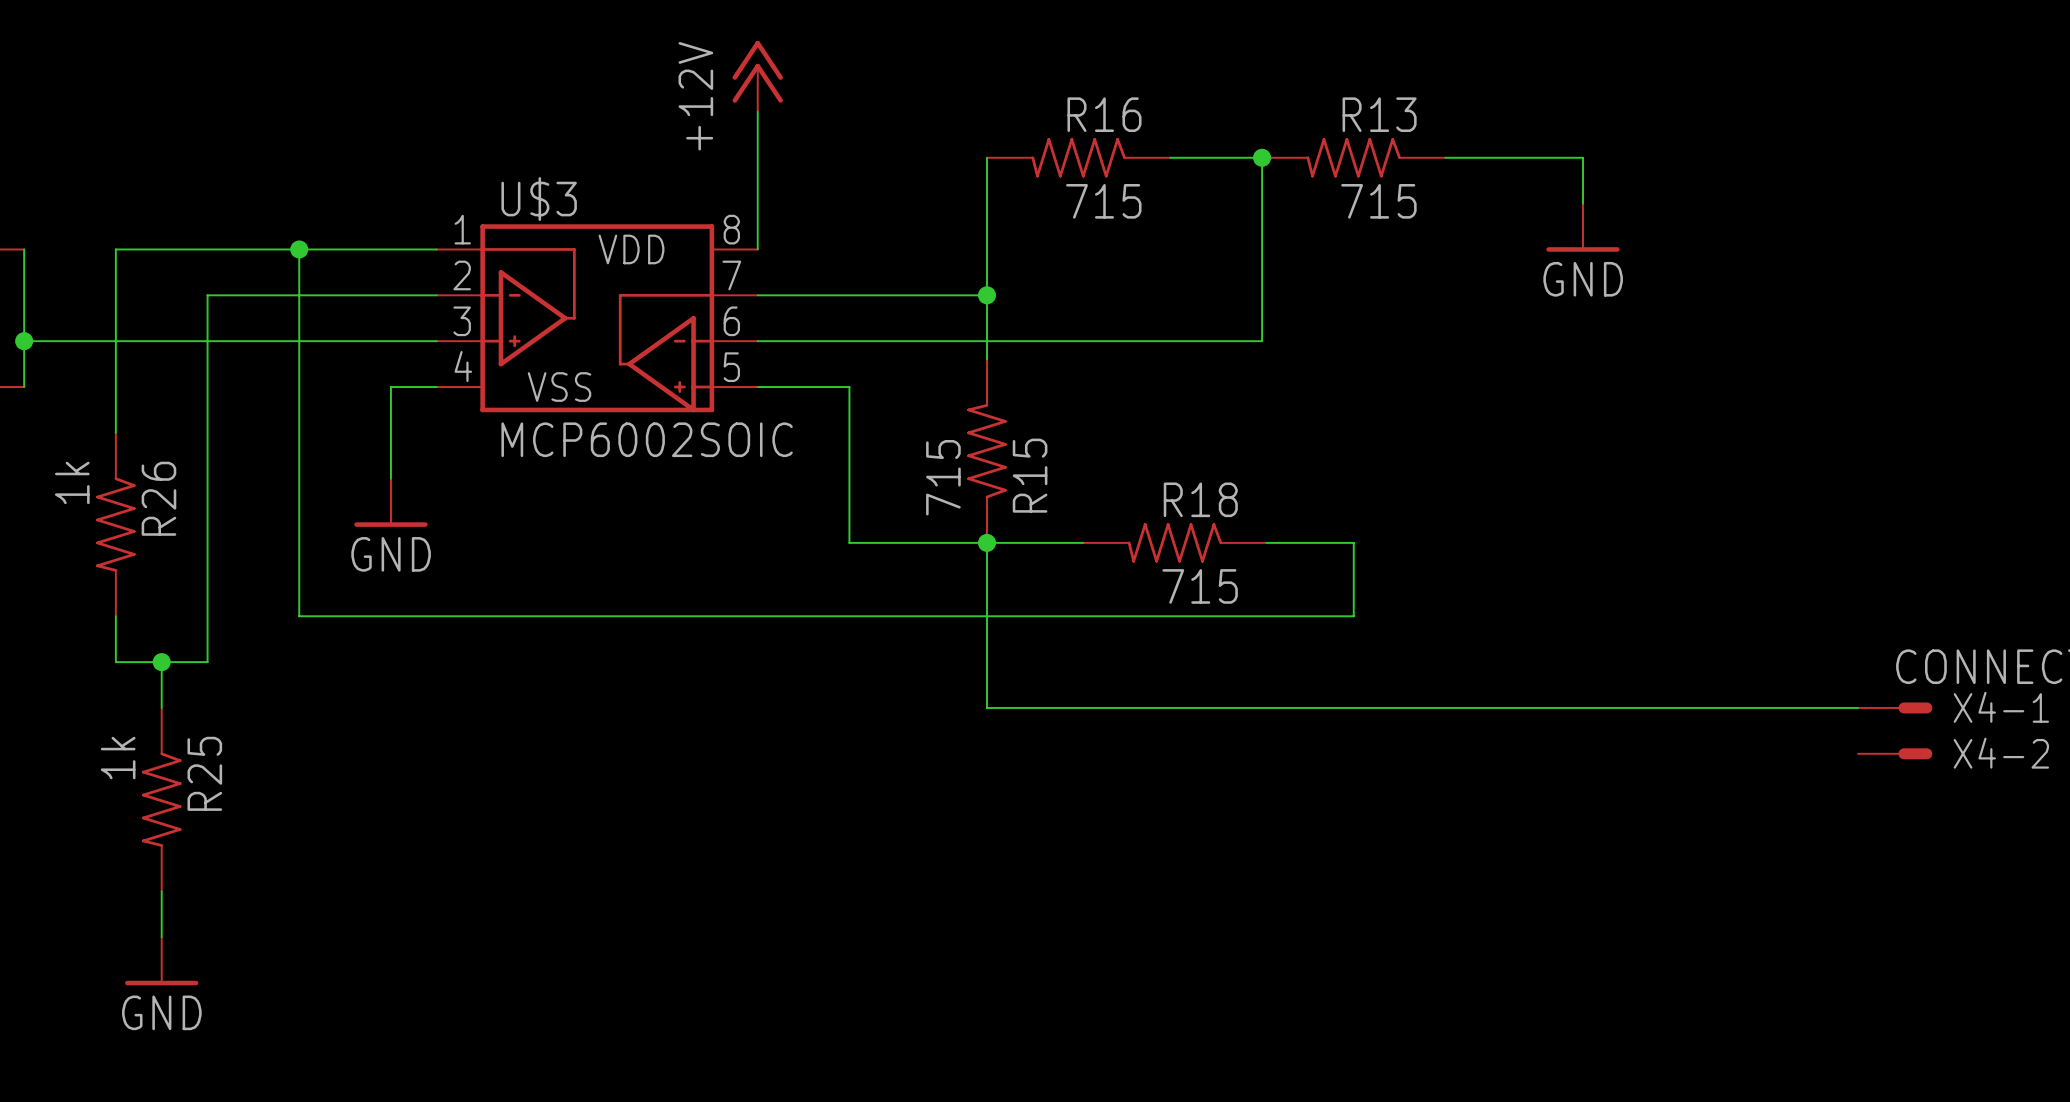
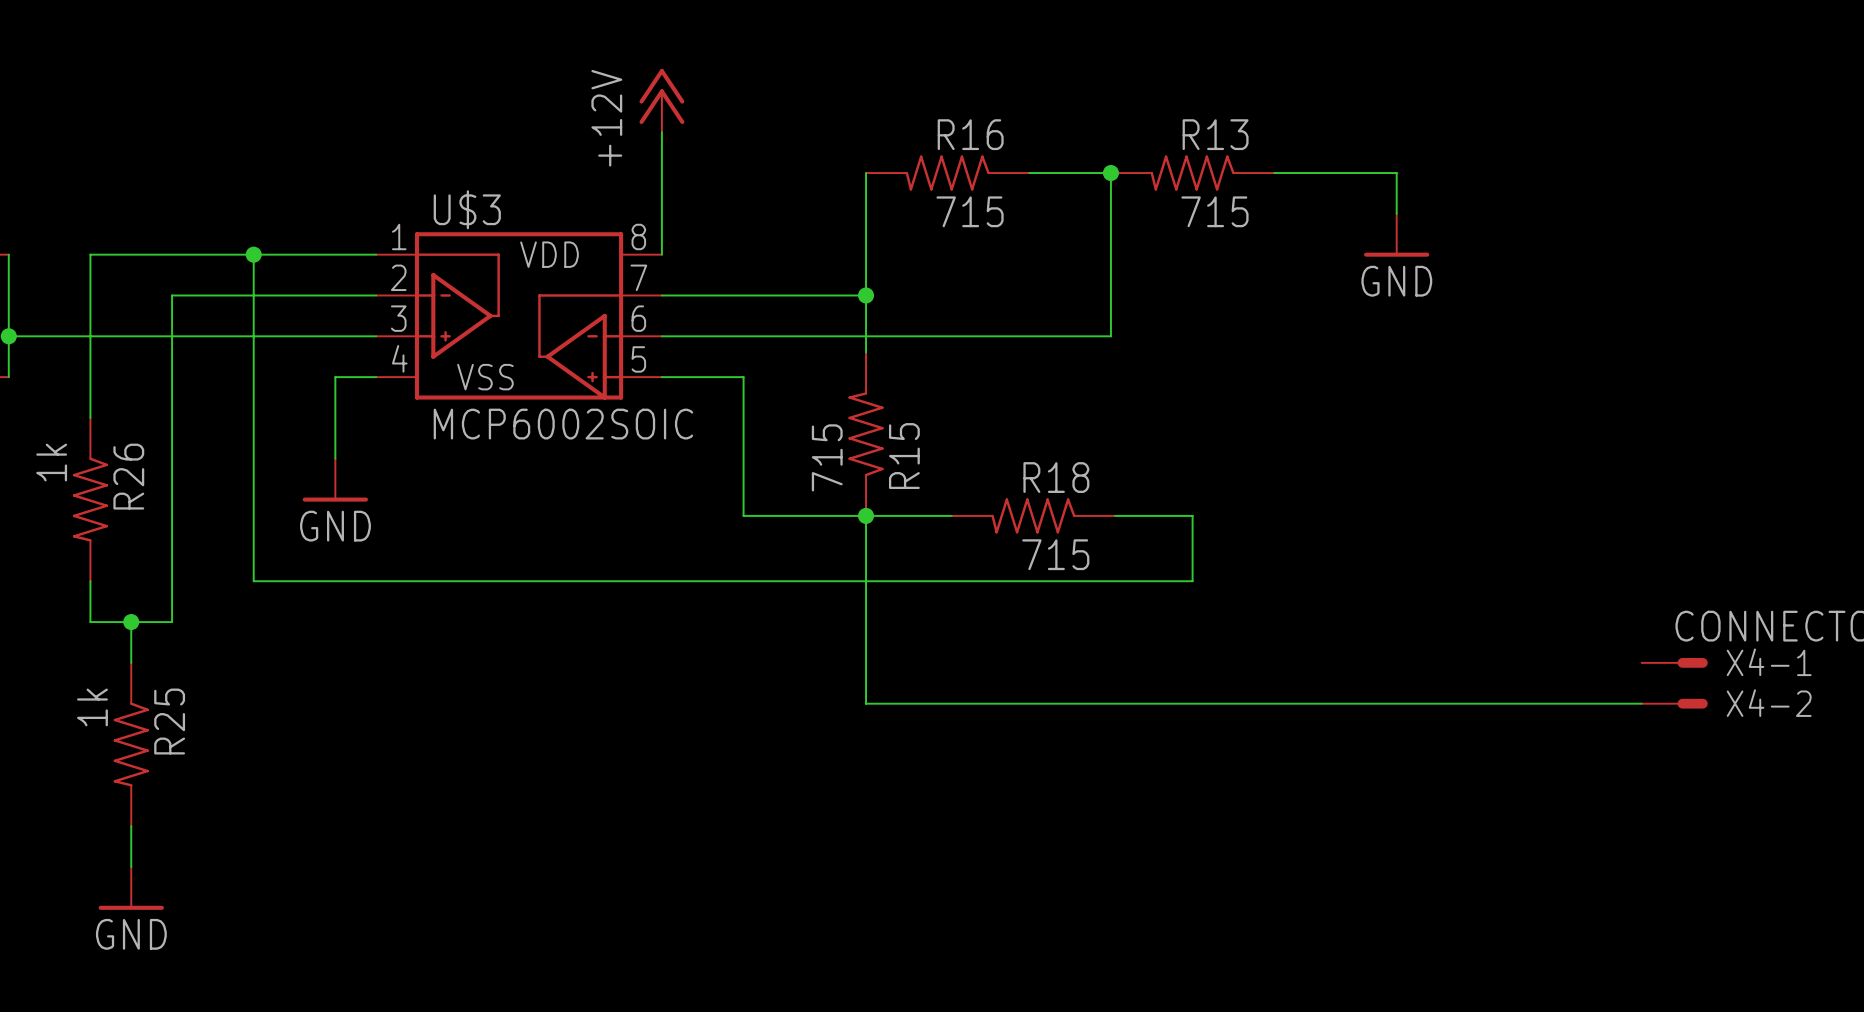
wire: (986, 707) (1858, 707) -> (866, 662) (866, 703) (1641, 703)

